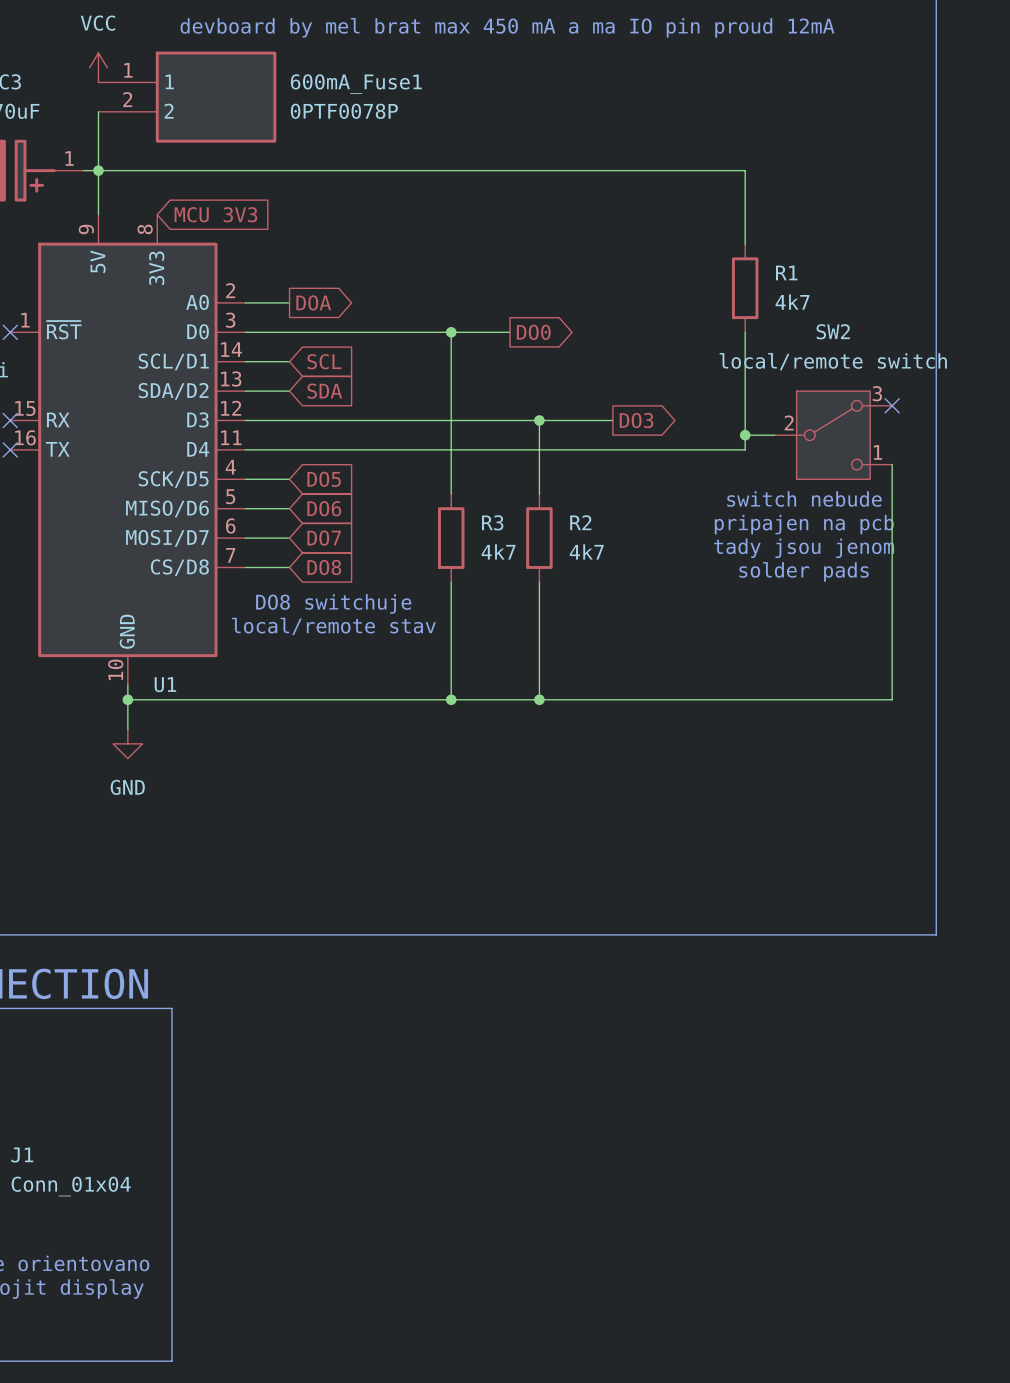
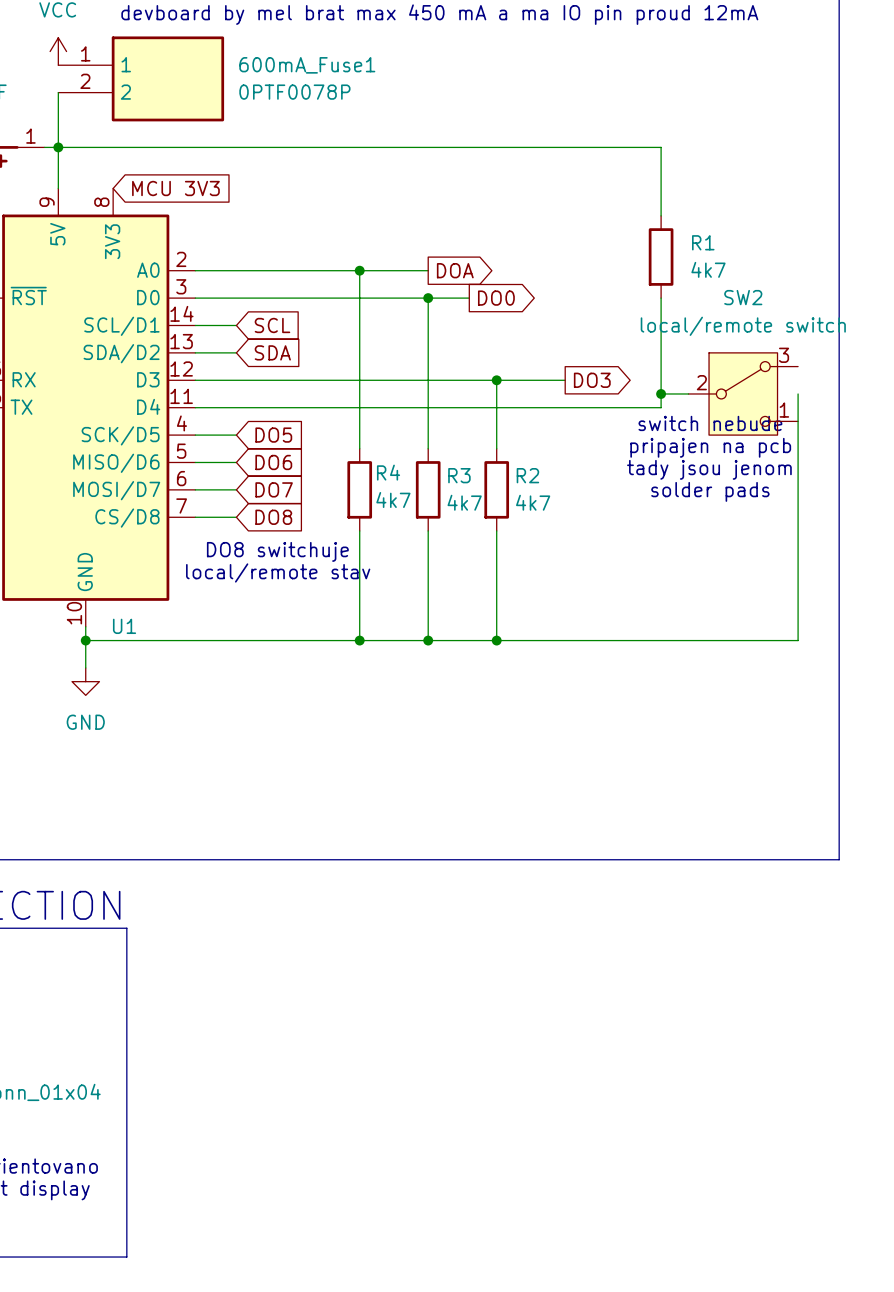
wire: none -> (236, 270) (428, 270)
global label position: DOA (313, 302) -> DOA (455, 270)
wire: none -> (359, 270) (359, 448)
junction: none -> (359, 270)
wire: (451, 332) (451, 493) -> (428, 298) (428, 448)
junction: (451, 332) -> none
junction: none -> (428, 298)
wire: none -> (441, 298) (469, 298)
global label position: DO0 (533, 332) -> DO0 (496, 298)
no-connect mark: (892, 405) -> none
wire: (539, 420) (539, 493) -> (496, 380) (496, 448)
junction position: (539, 420) -> (496, 380)
wire: none -> (537, 380) (565, 380)
global label position: DO3 (636, 420) -> DO3 (592, 380)
wire: none -> (798, 393) (798, 421)
text position: switch nebude (804, 498) -> switch nebude (710, 423)
R3 name position: R3 (492, 522) -> R3 (459, 475)
R2 name position: R2 (580, 522) -> R2 (527, 475)
text position: pripajen na pcb (804, 524) -> pripajen na pcb (710, 447)
R4: none -> 4k7 (359, 489)
R3 position: (451, 538) -> (428, 489)
R2 position: (539, 538) -> (496, 489)
text position: tady jsou jenom (804, 548) -> tady jsou jenom (709, 469)
R3 value position: 4k7 (498, 551) -> 4k7 (464, 502)
R2 value position: 4k7 (586, 551) -> 4k7 (533, 502)
text position: solder pads (804, 571) -> solder pads (710, 491)
wire: none -> (359, 530) (359, 640)
wire: (451, 582) (451, 699) -> (428, 530) (428, 640)
wire: (539, 582) (539, 699) -> (496, 530) (496, 640)
junction: none -> (359, 640)
junction: (451, 699) -> none
junction: none -> (428, 640)
junction: (539, 699) -> none
junction: none -> (496, 640)

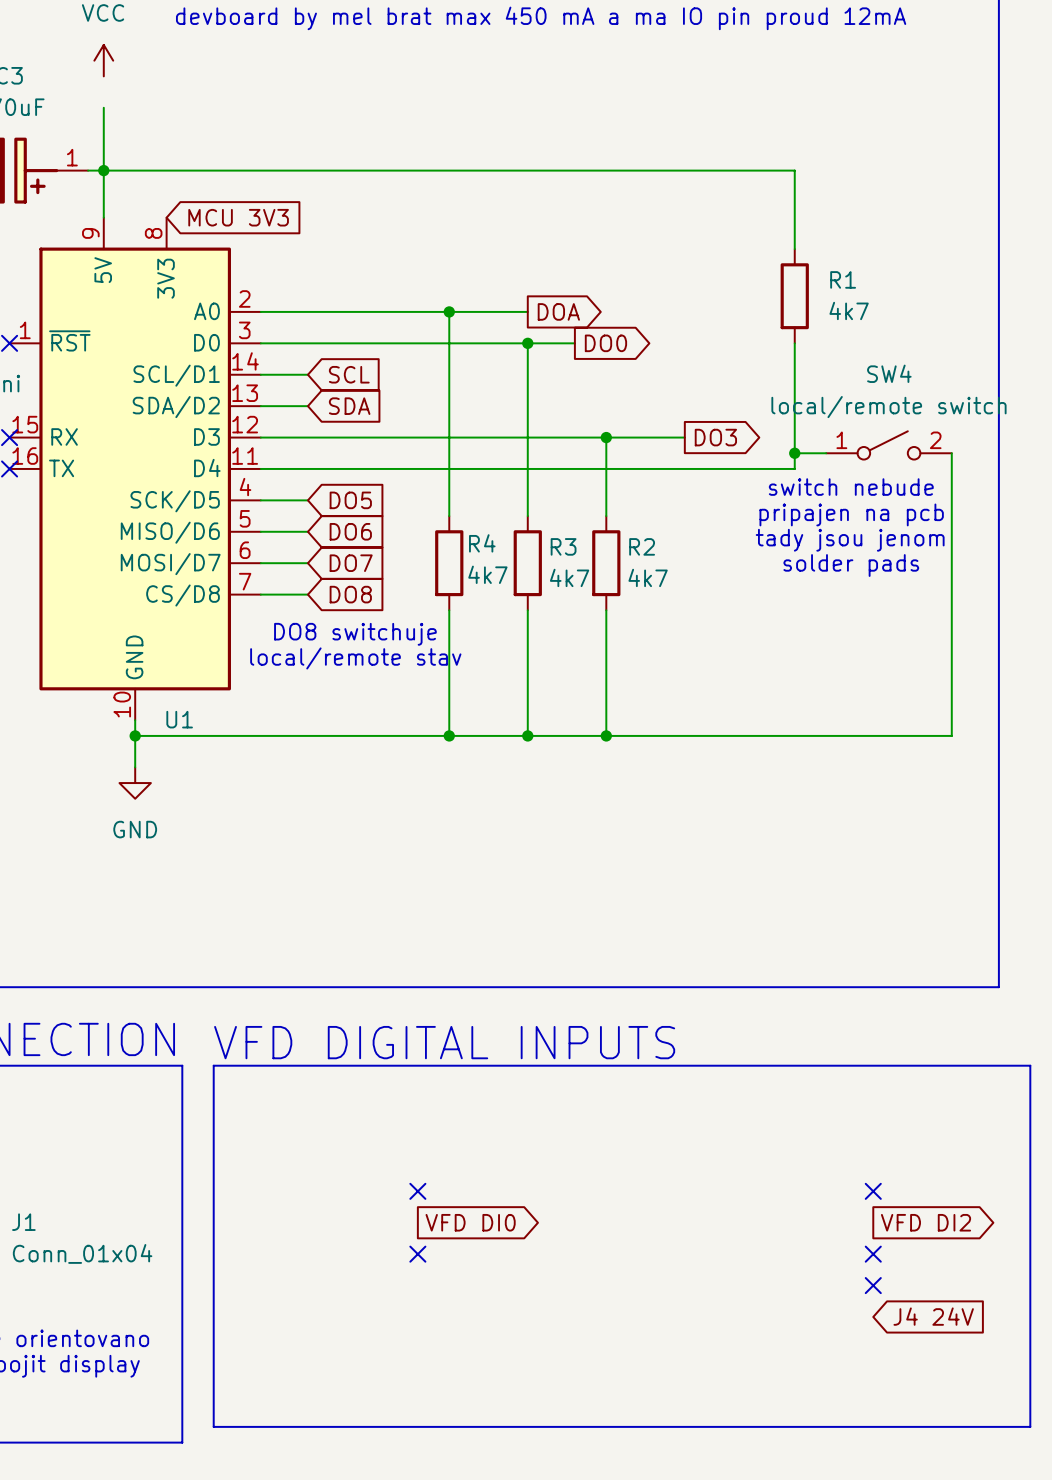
600mA_Fuse1: 0PTF0078P (141, 78) -> none
SW4: none -> local/remote switch (888, 445)
SW2: local/remote switch (743, 393) -> none
text: none -> VFD DIGITAL INPUTS (444, 1042)
line: none -> (213, 1065) (213, 1426) (1030, 1426) (1030, 1065) (213, 1065)
no-connect mark: none -> (417, 1191)
no-connect mark: none -> (873, 1191)
global label: none -> VFD DI0 (470, 1222)
global label: none -> VFD DI2 (926, 1222)
no-connect mark: none -> (417, 1254)
no-connect mark: none -> (873, 1254)
no-connect mark: none -> (873, 1285)
global label: none -> J4 24V (933, 1316)

